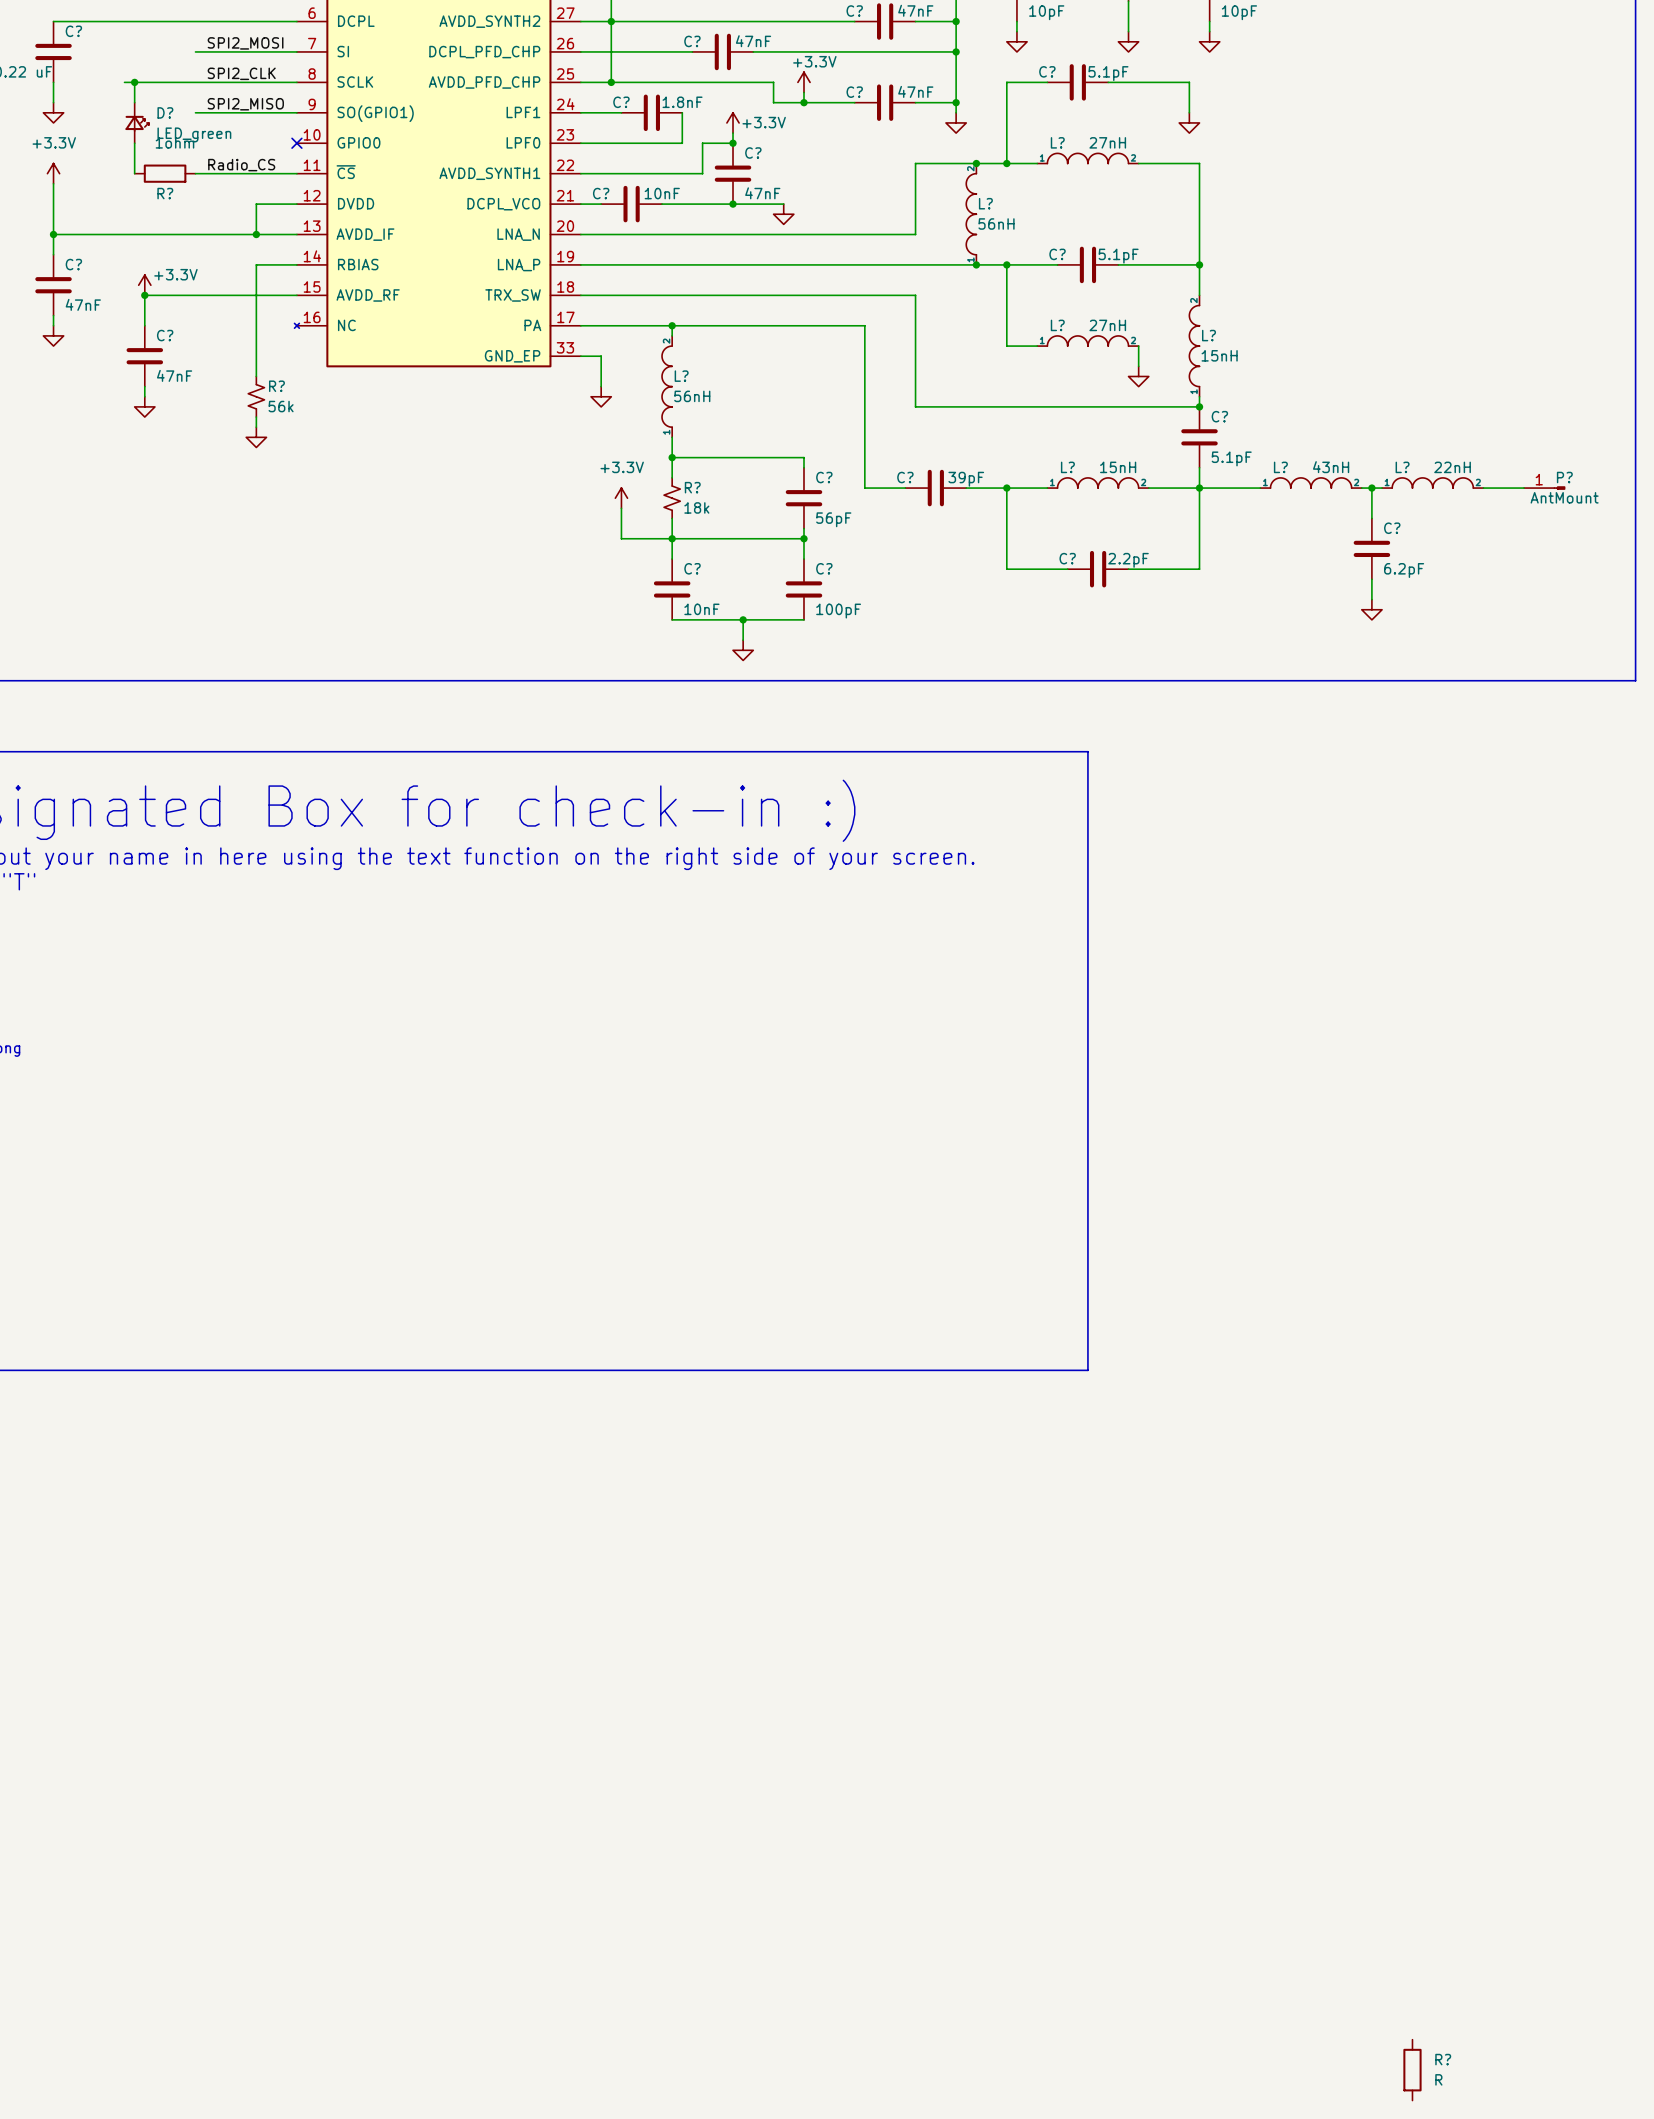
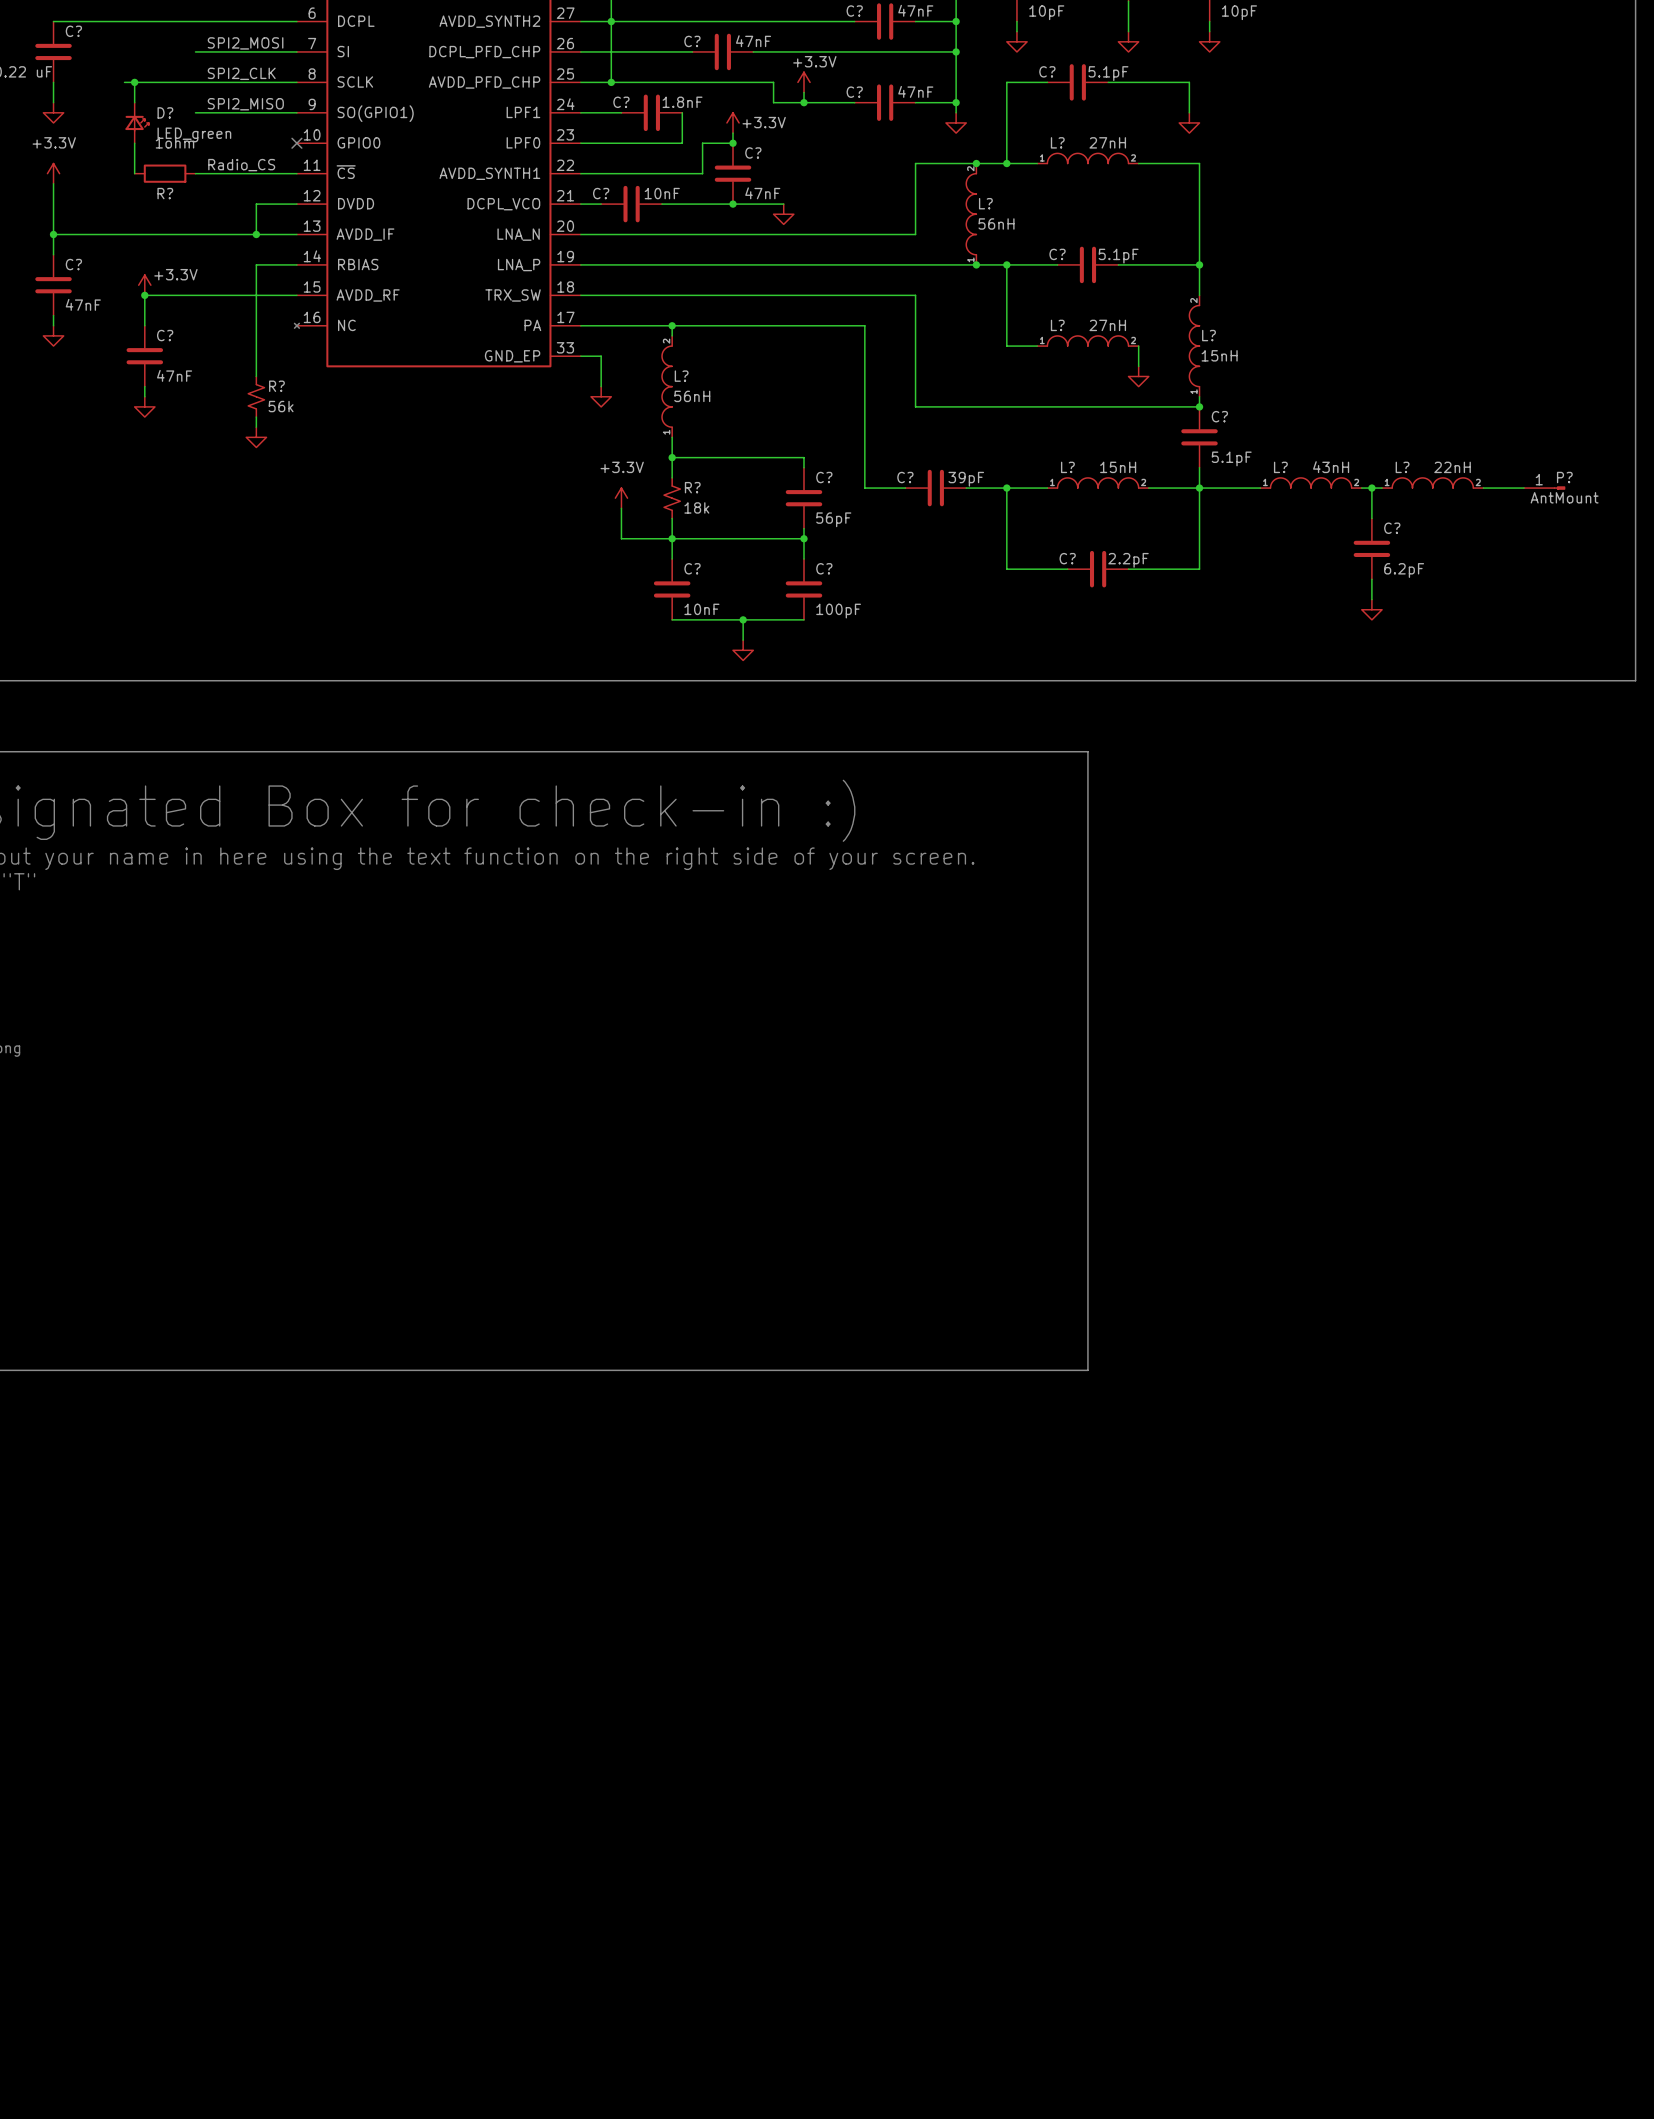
R?: R (1412, 2070) -> none

